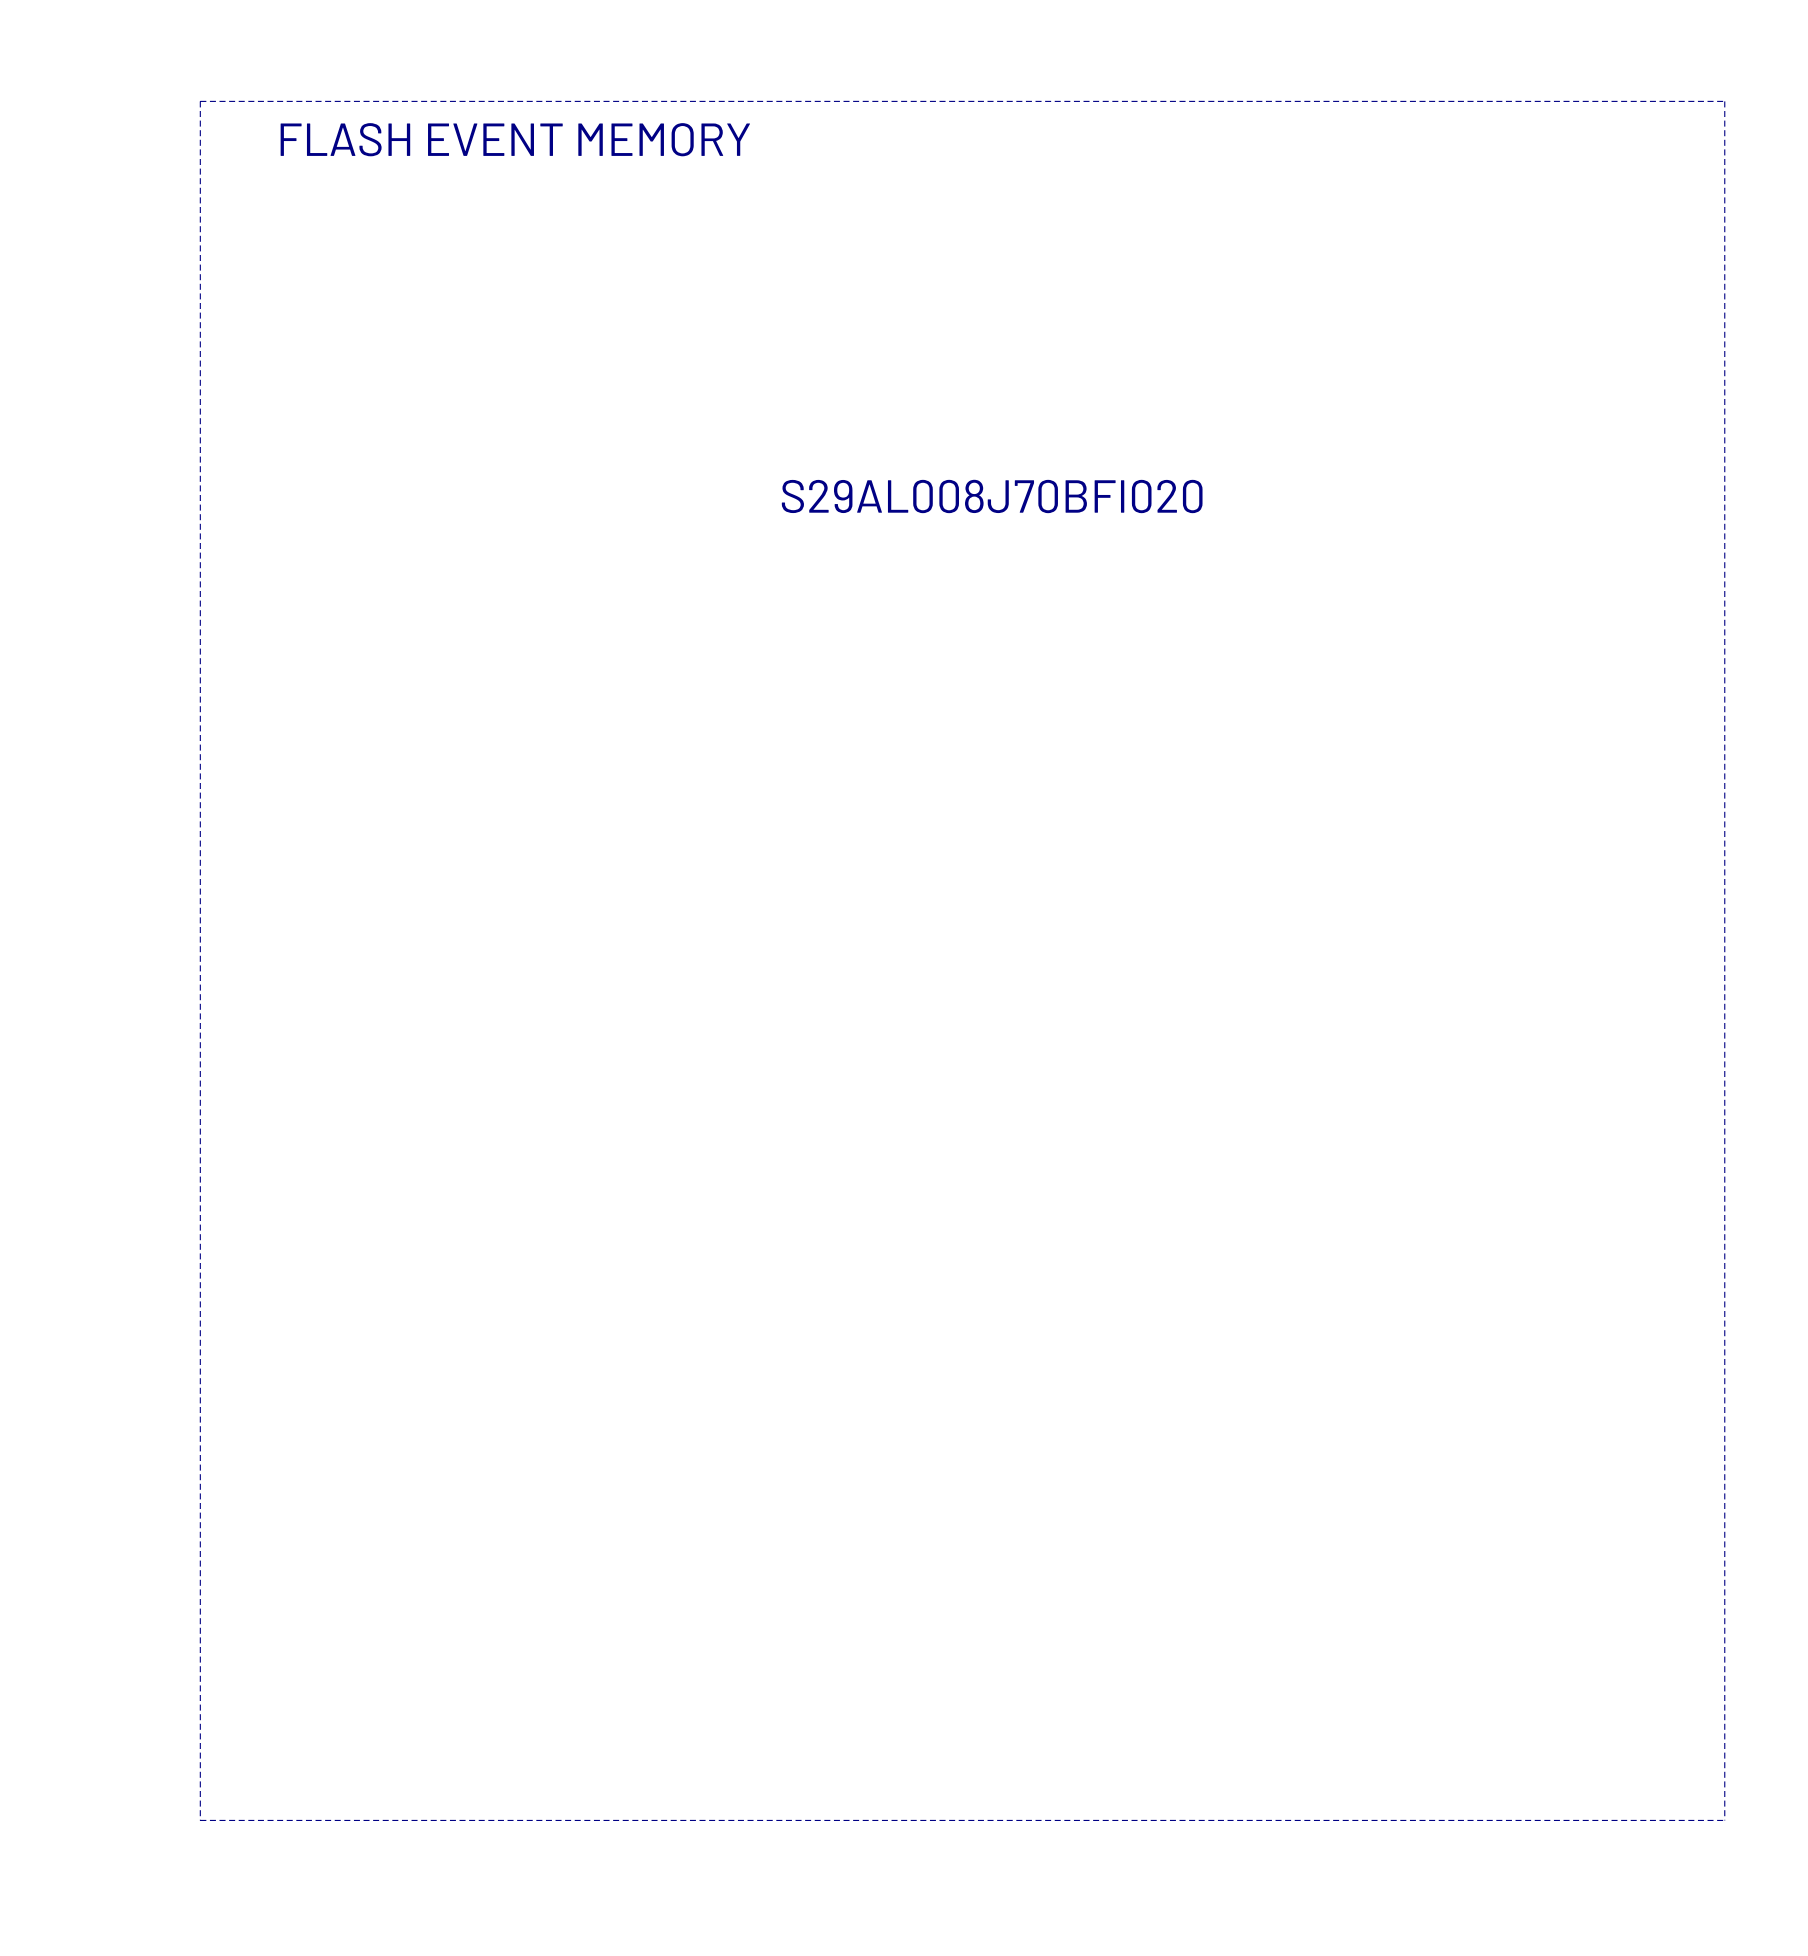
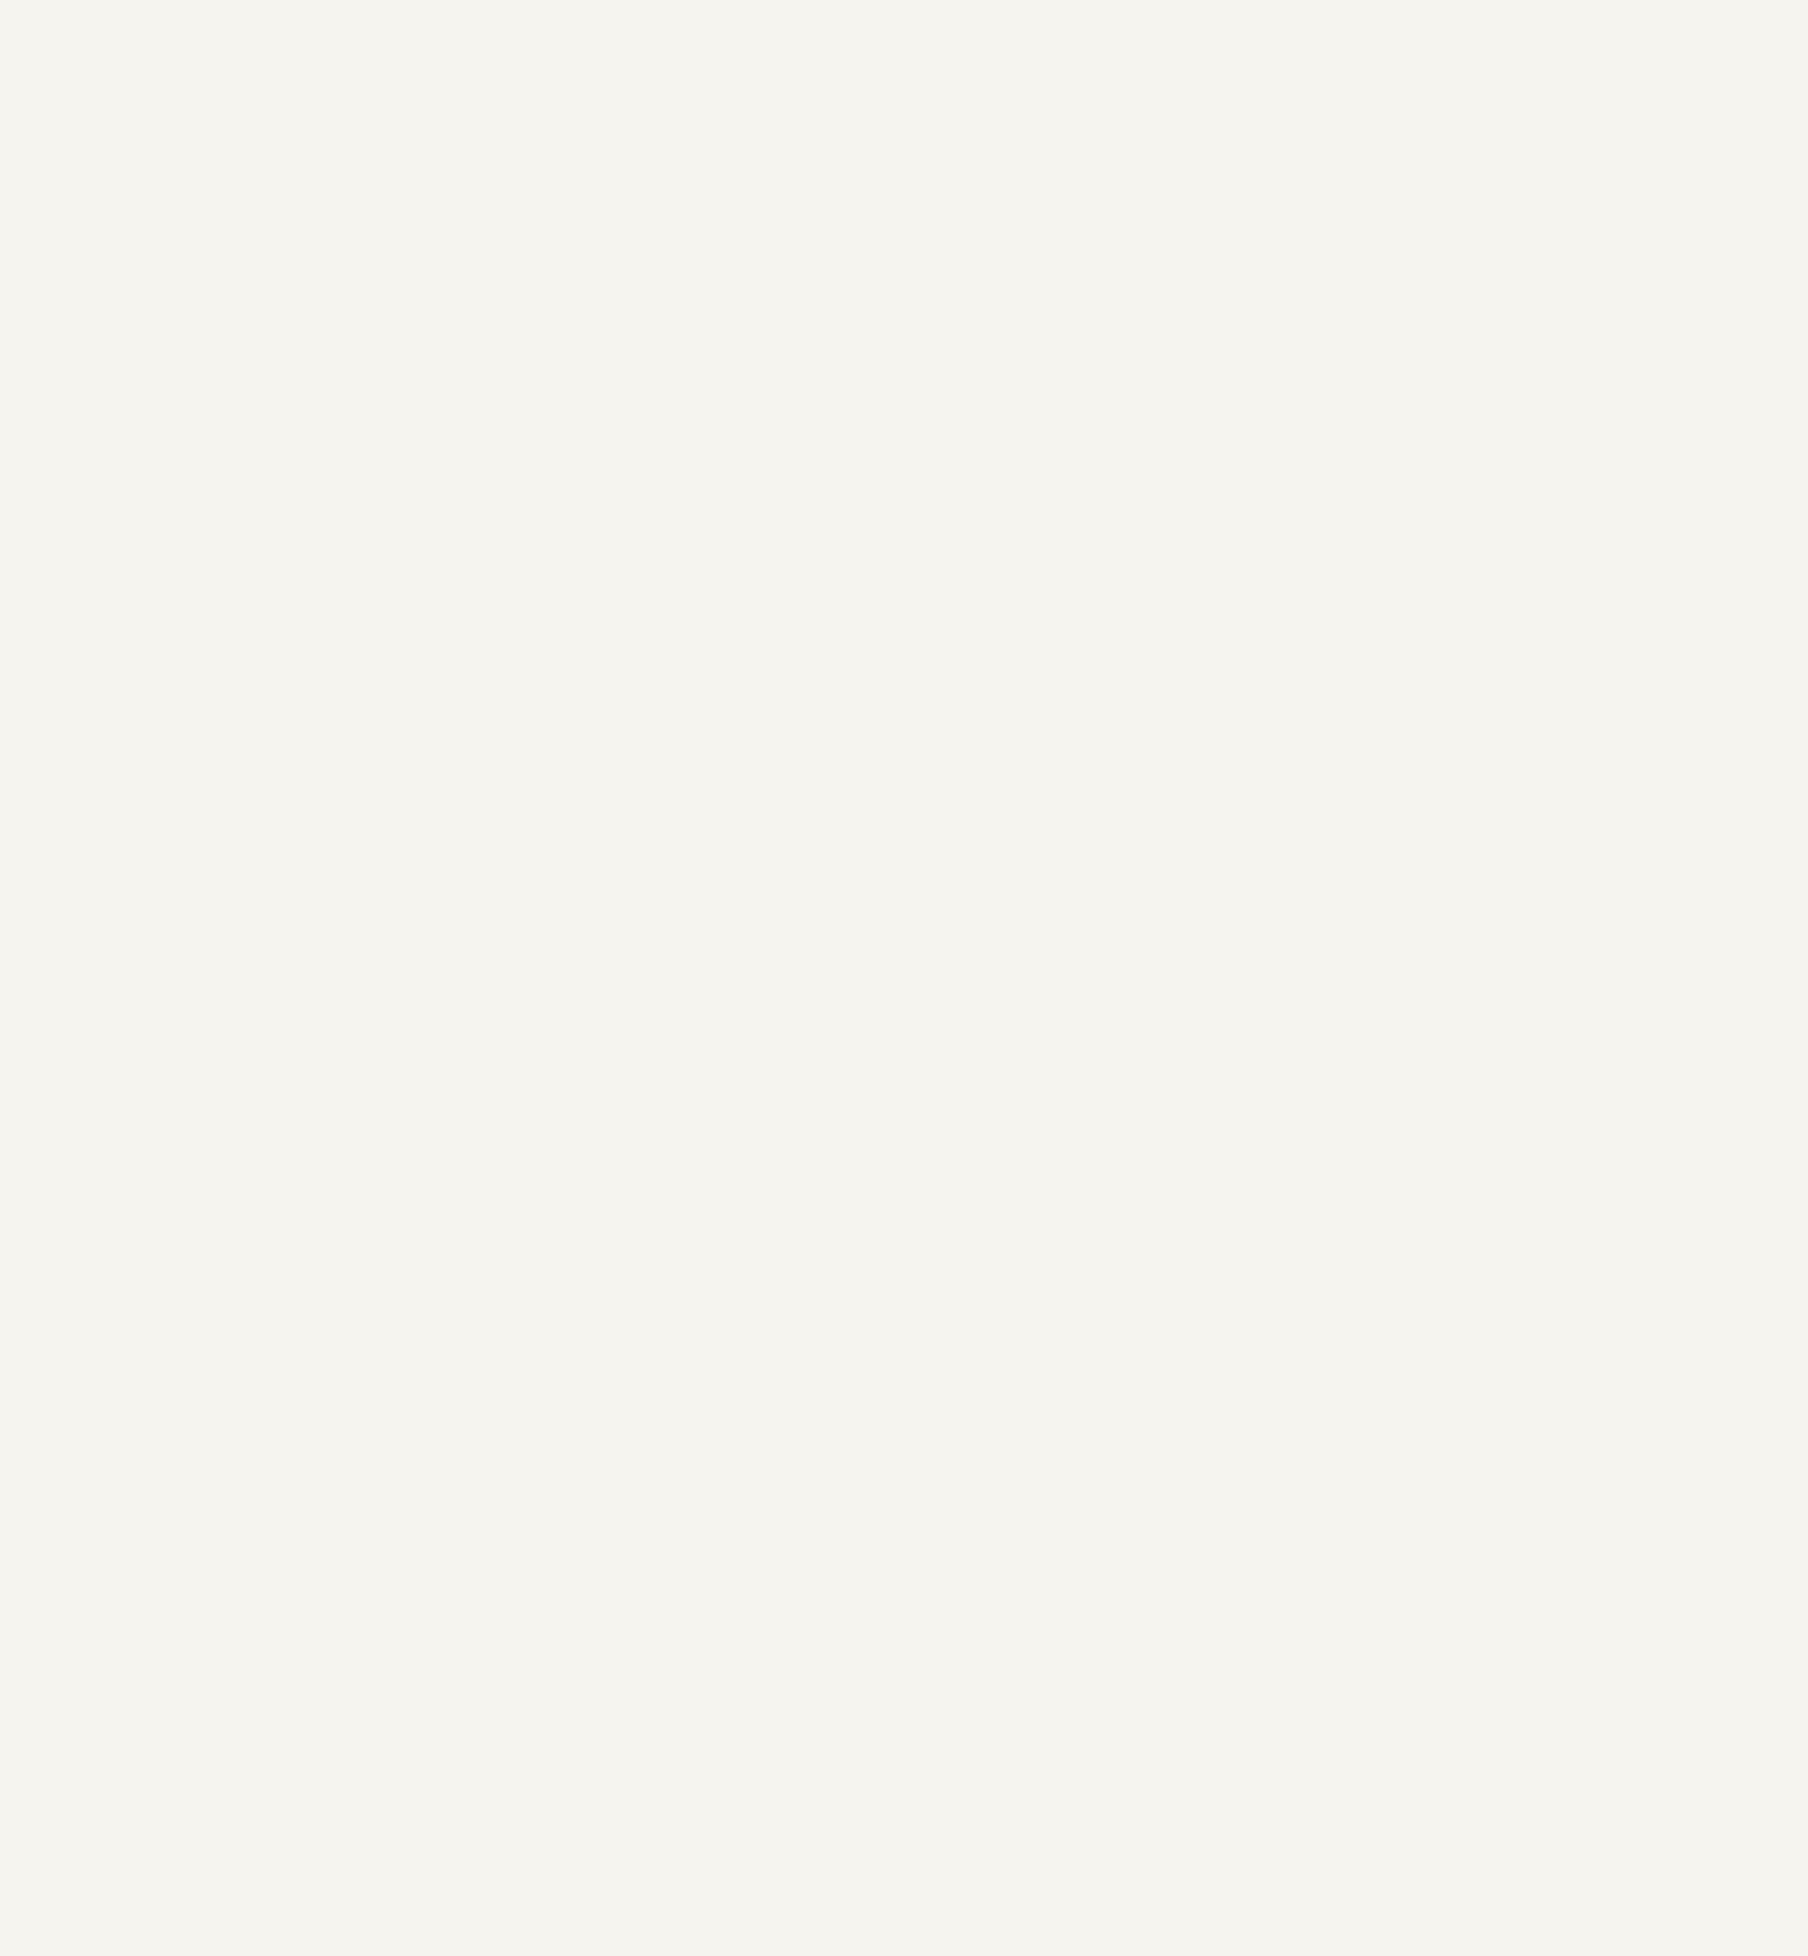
line: (200, 101) (200, 1820) (1724, 1820) (1724, 101) (200, 101) -> none
text: FLASH EVENT MEMORY (515, 139) -> none
text: S29AL008J70BFI020 (992, 496) -> none

